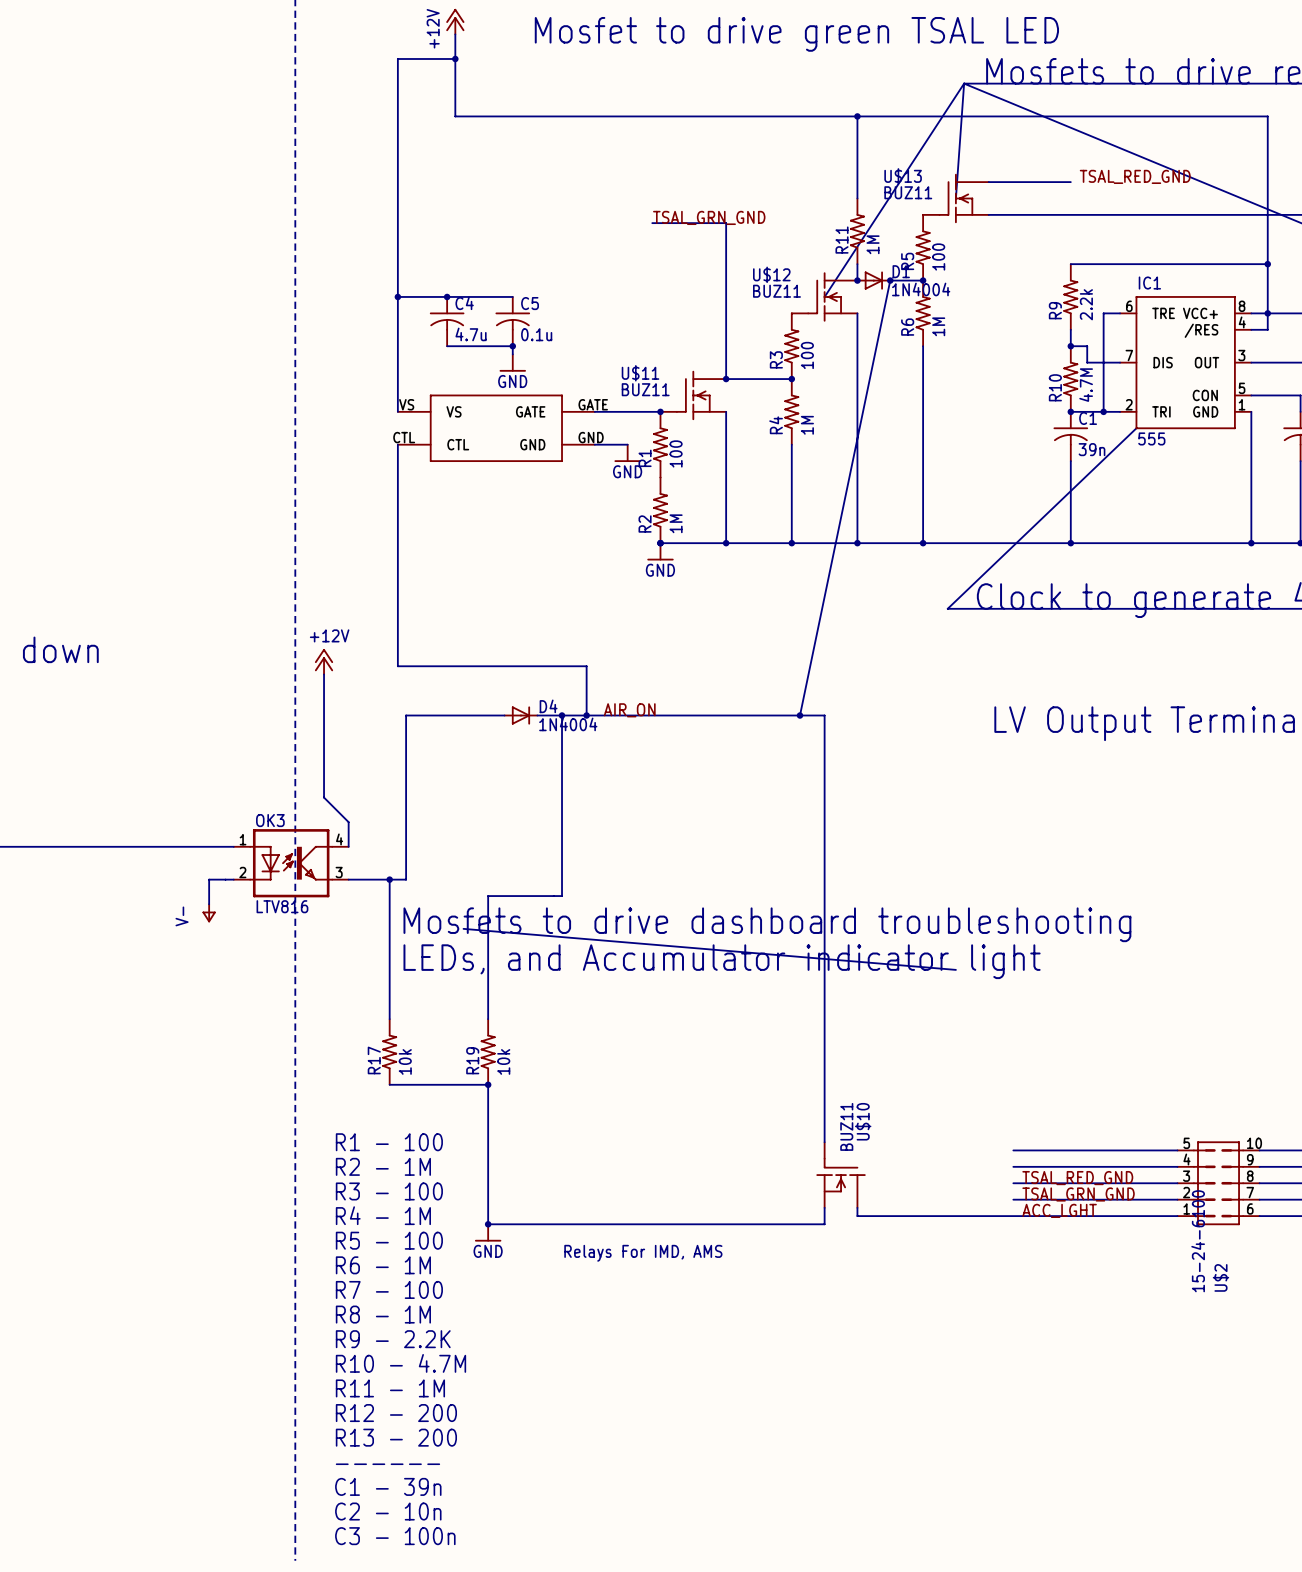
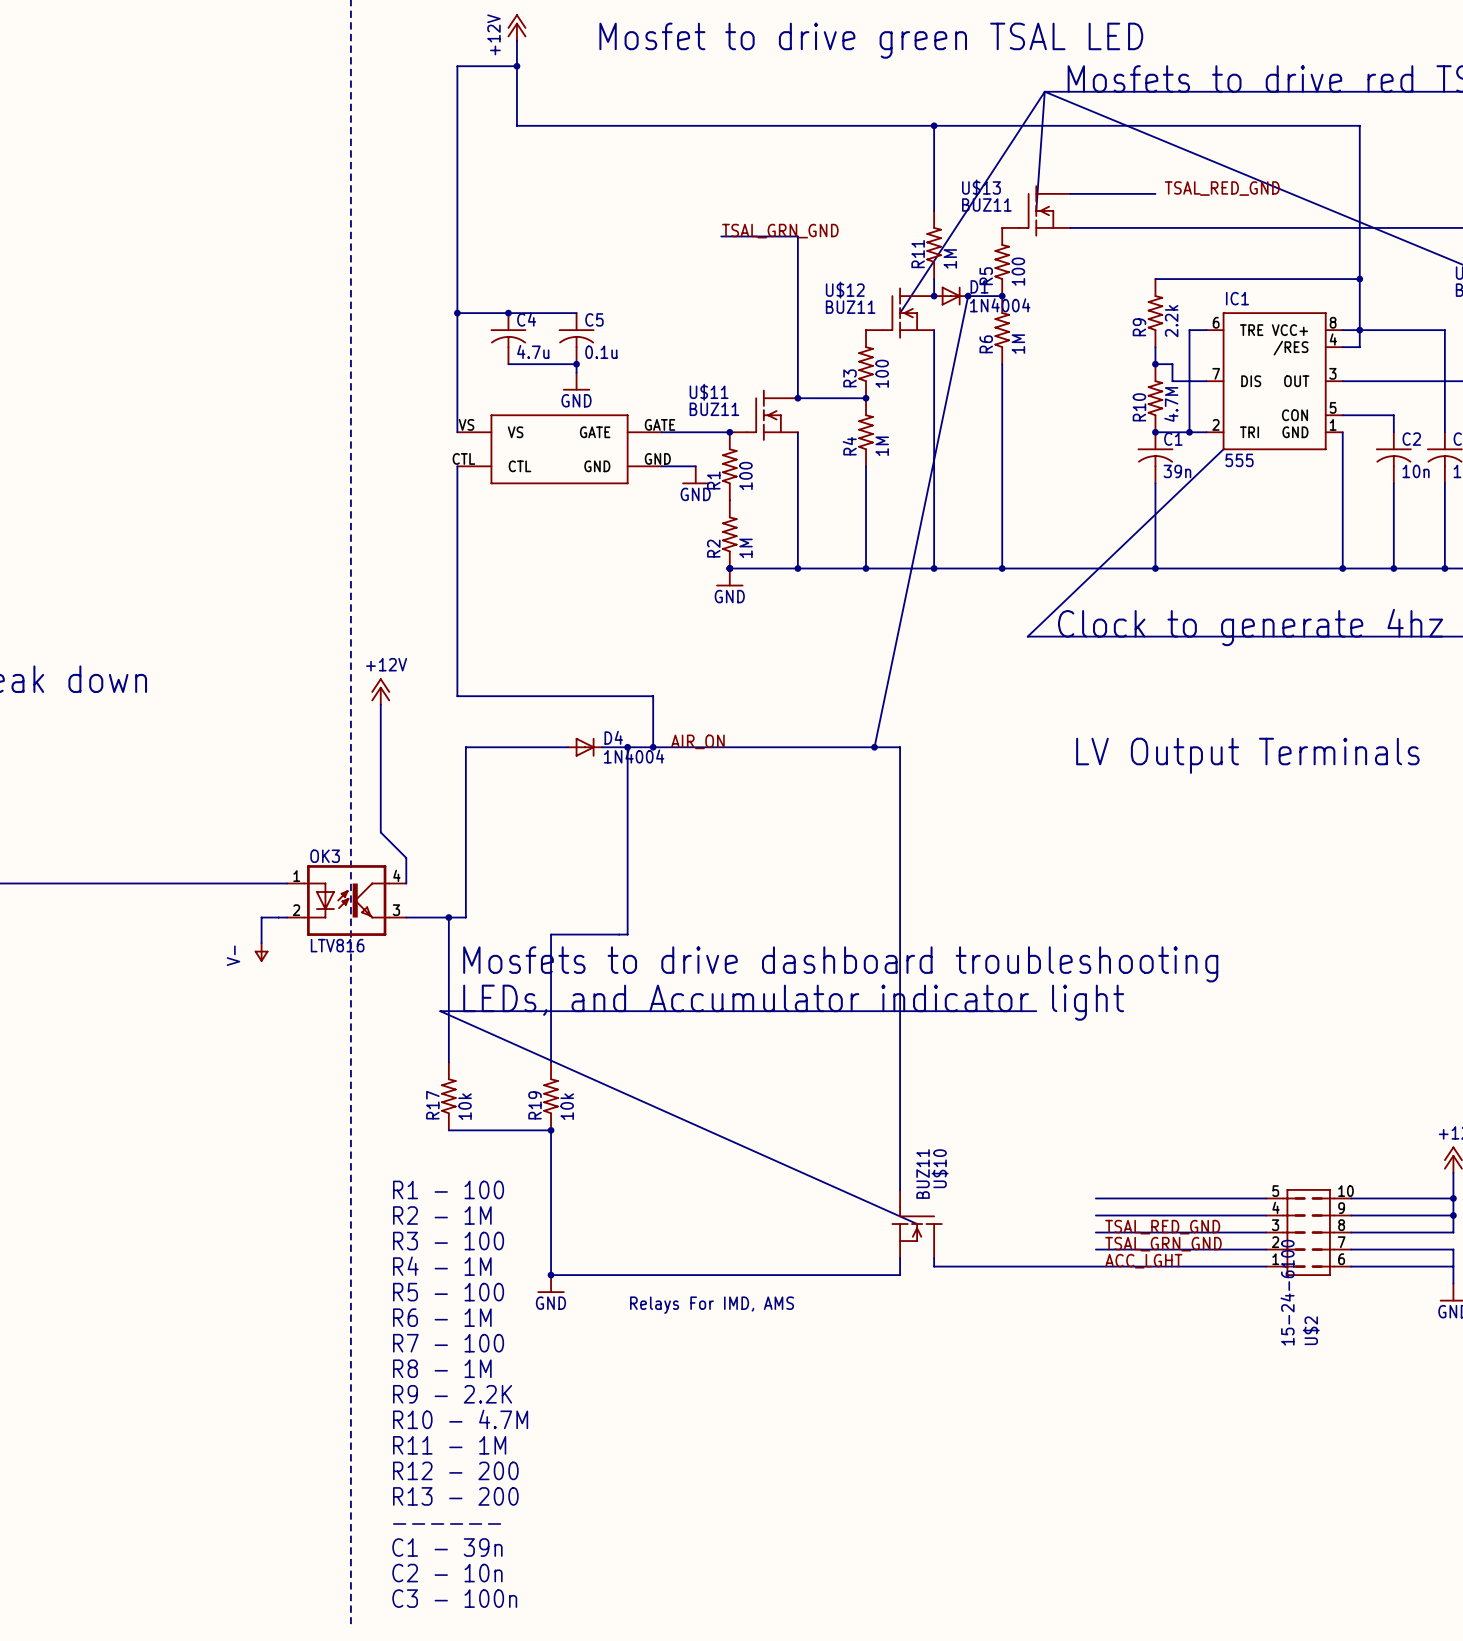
line: (463, 928) (955, 969) -> (917, 1224) (440, 1011) (1036, 1011)

